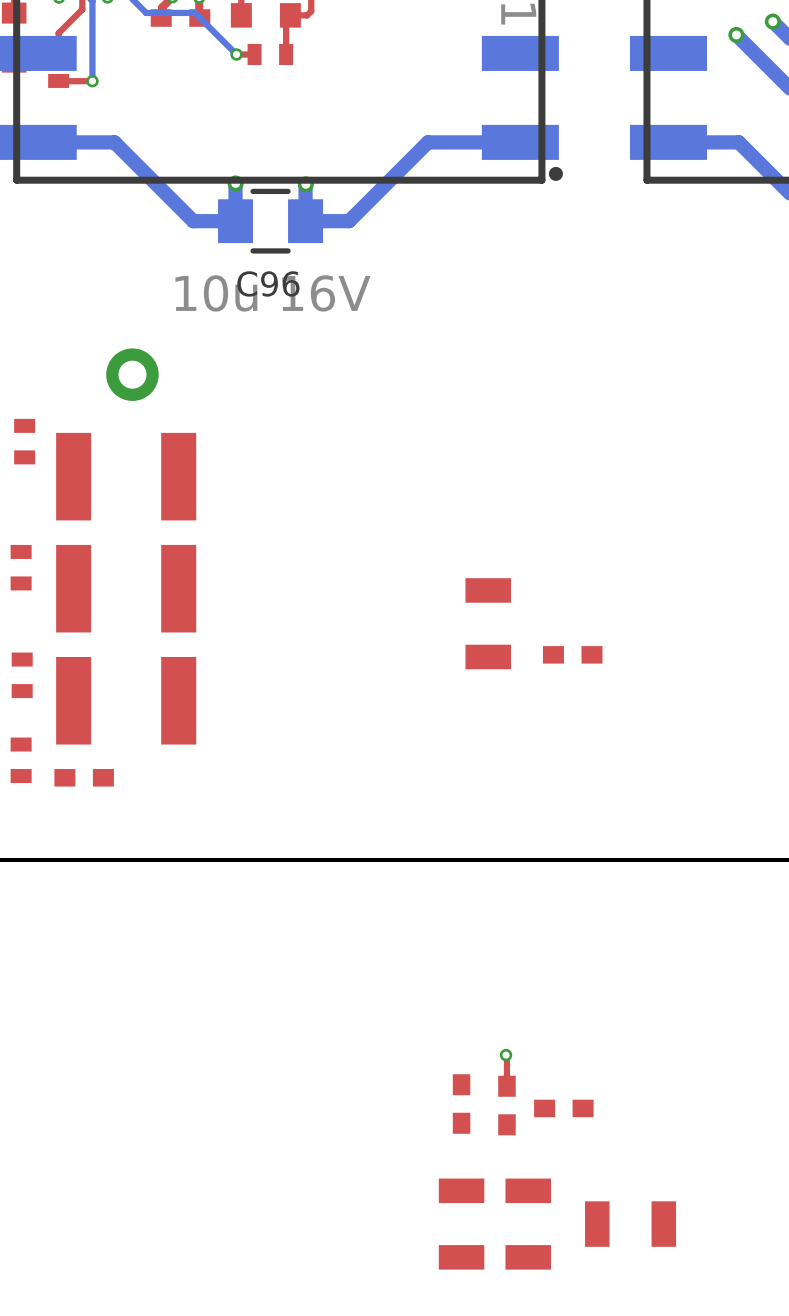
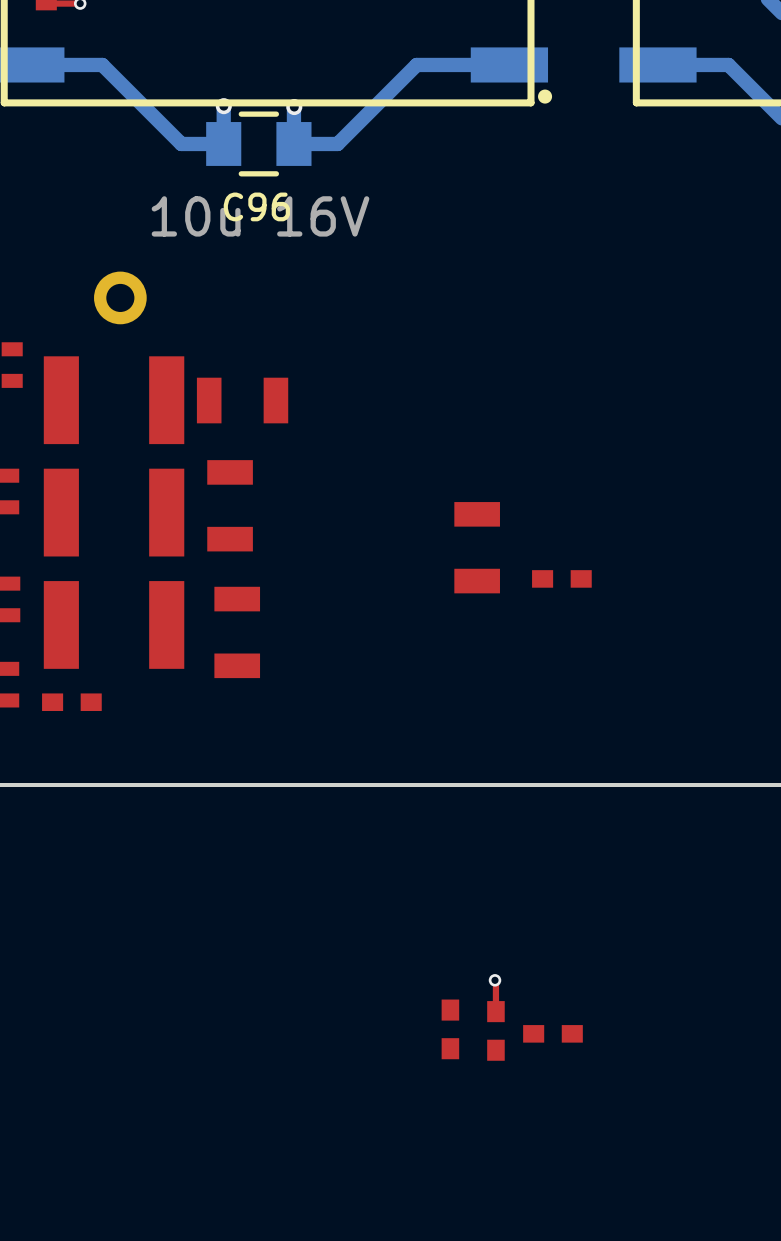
part: none -> (242, 400)
part: none -> (230, 505)
part: none -> (237, 632)
part: (461, 1224) -> none
part: (528, 1224) -> none
part: (630, 1224) -> none

